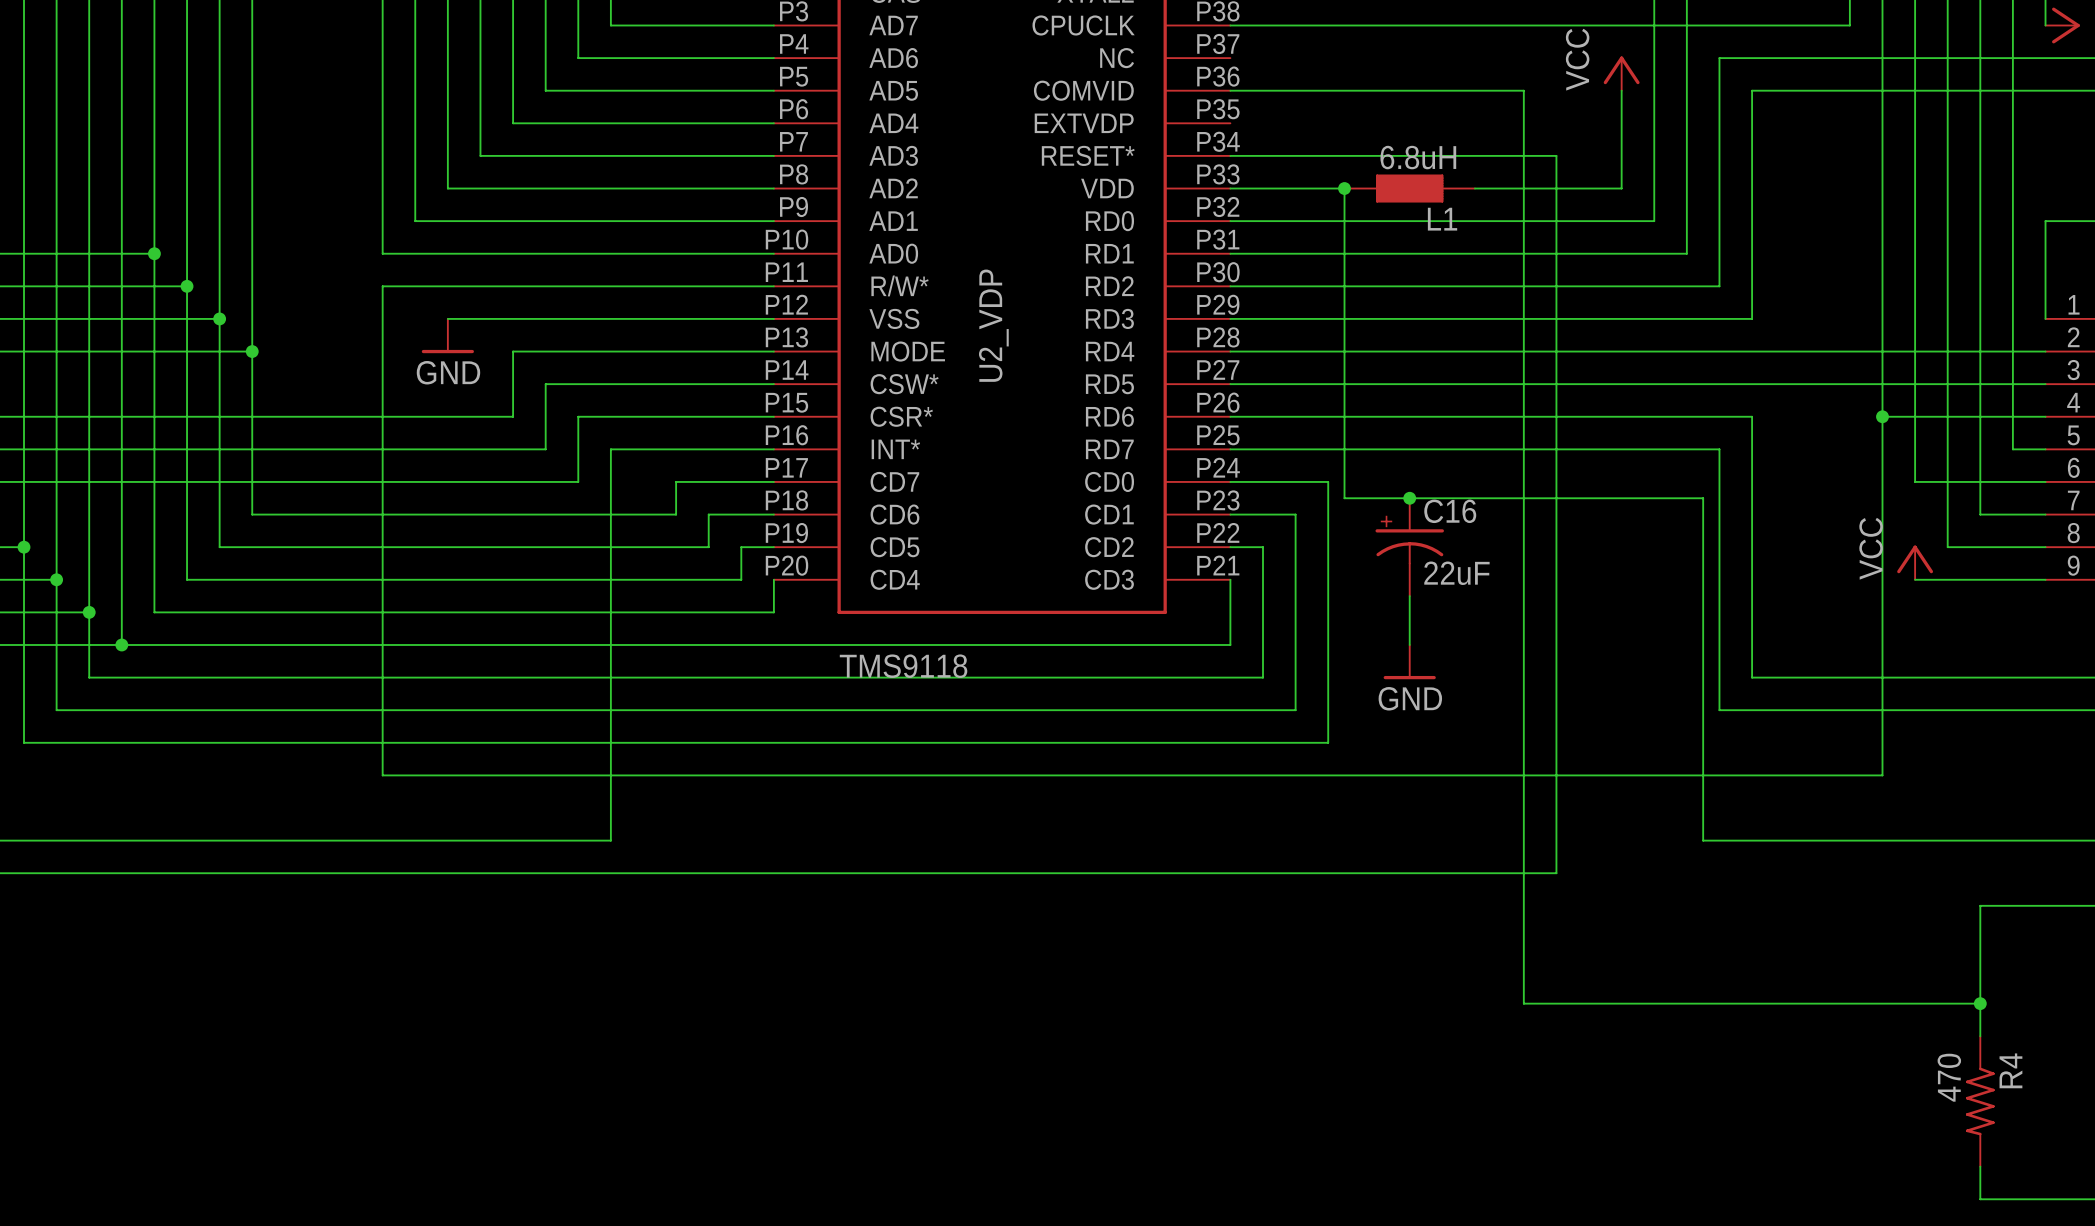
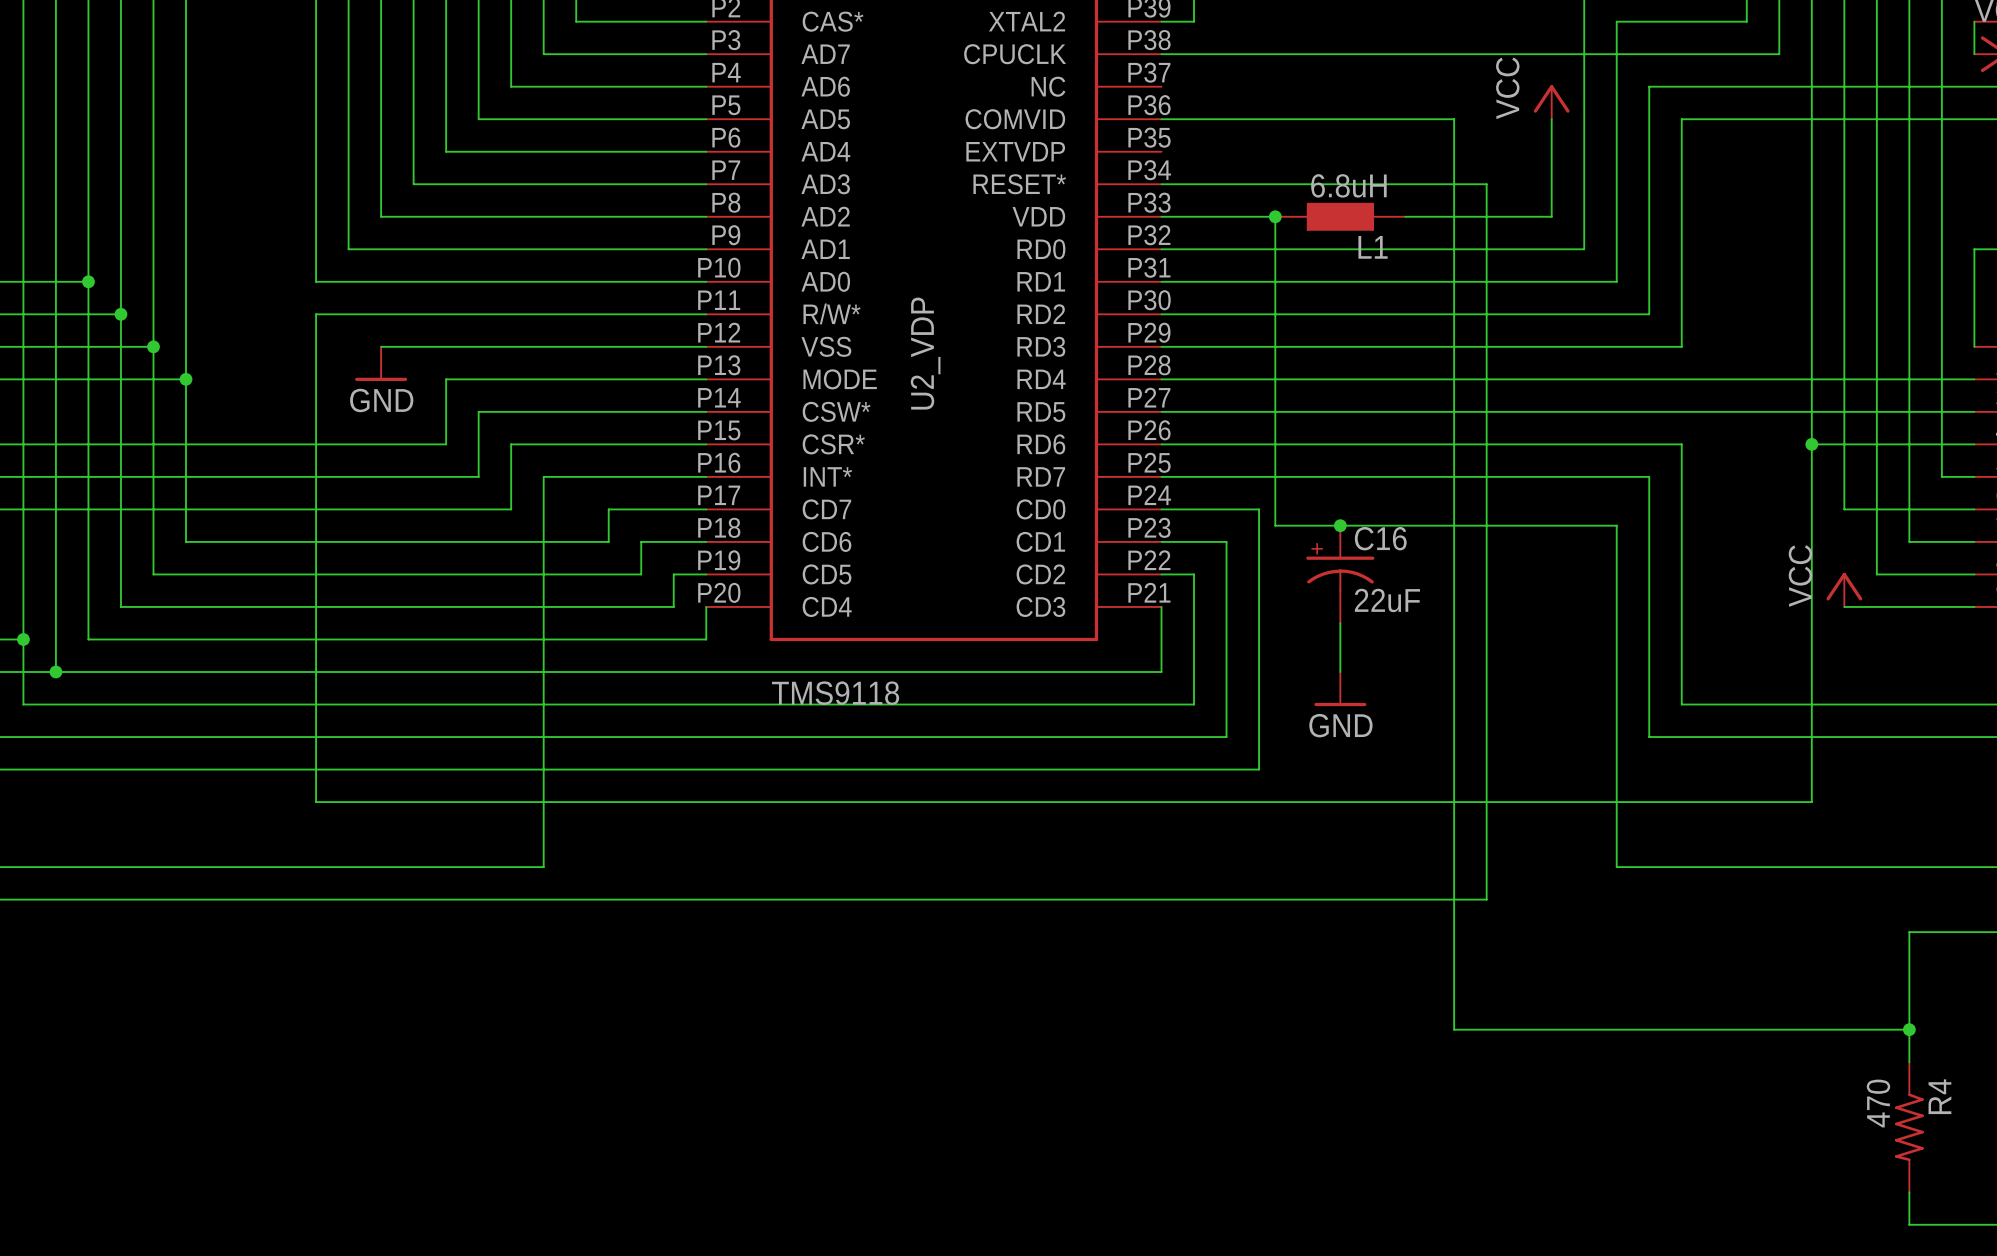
wire: (1686, 498) (1703, 498) (1703, 840) -> (1616, 525) (1616, 867) (1632, 867)

